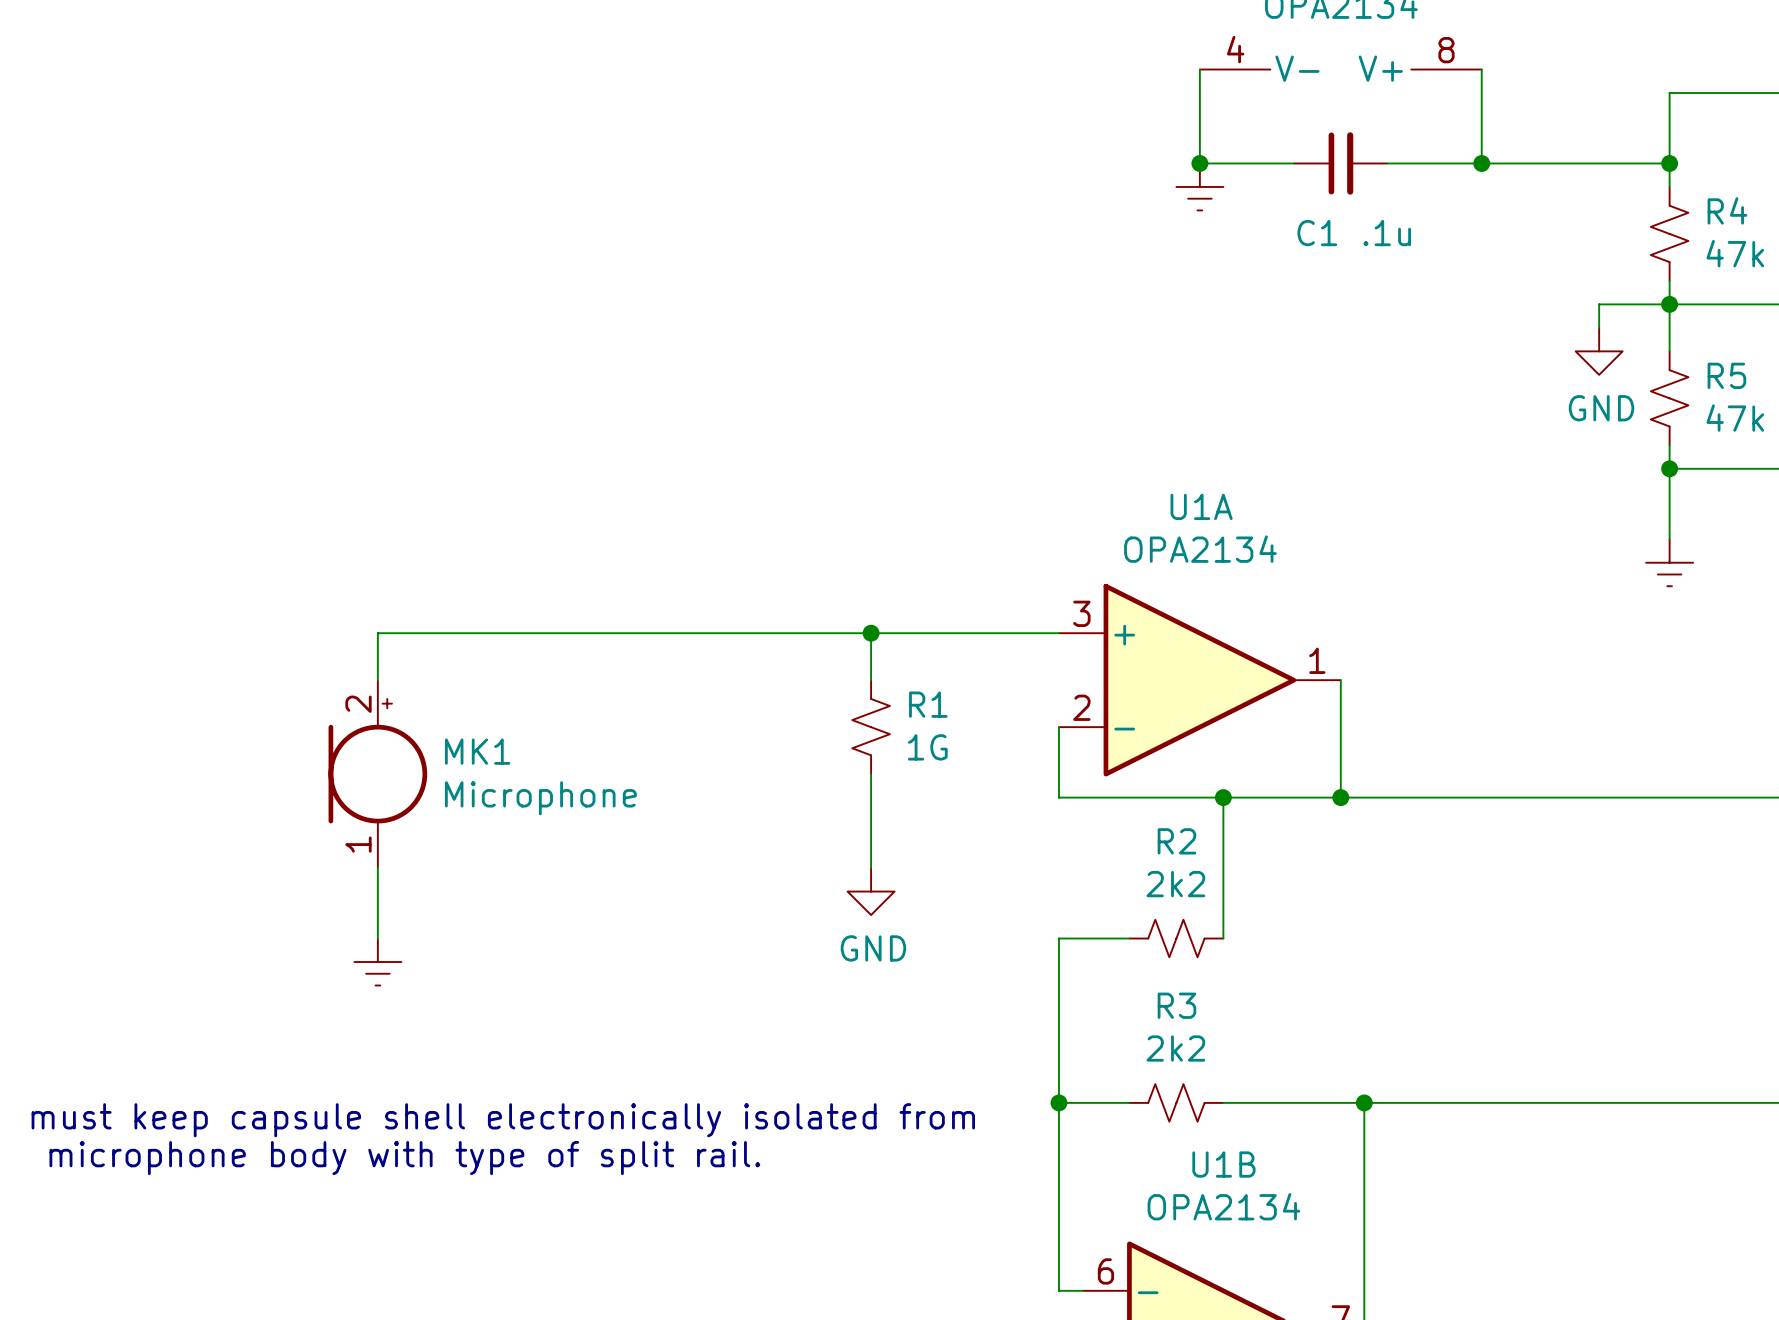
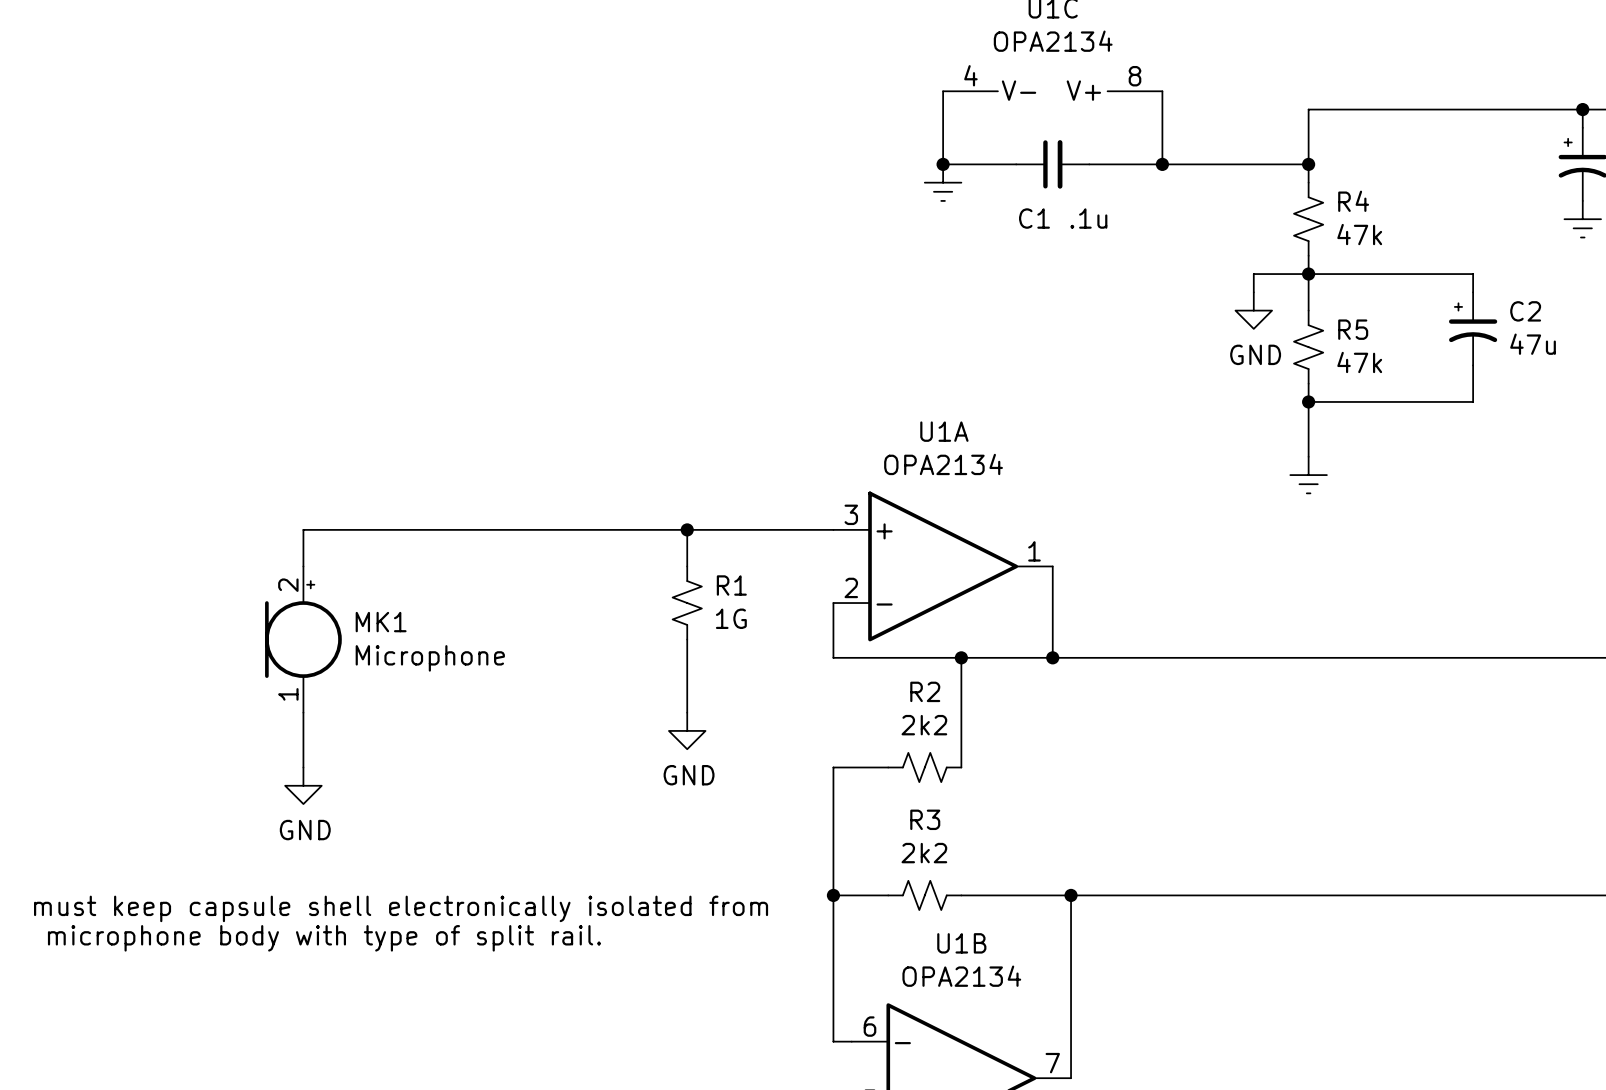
power symbol shape: [354, 938, 402, 986] -> [285, 767, 322, 805]
power symbol text: none -> GND (305, 830)

